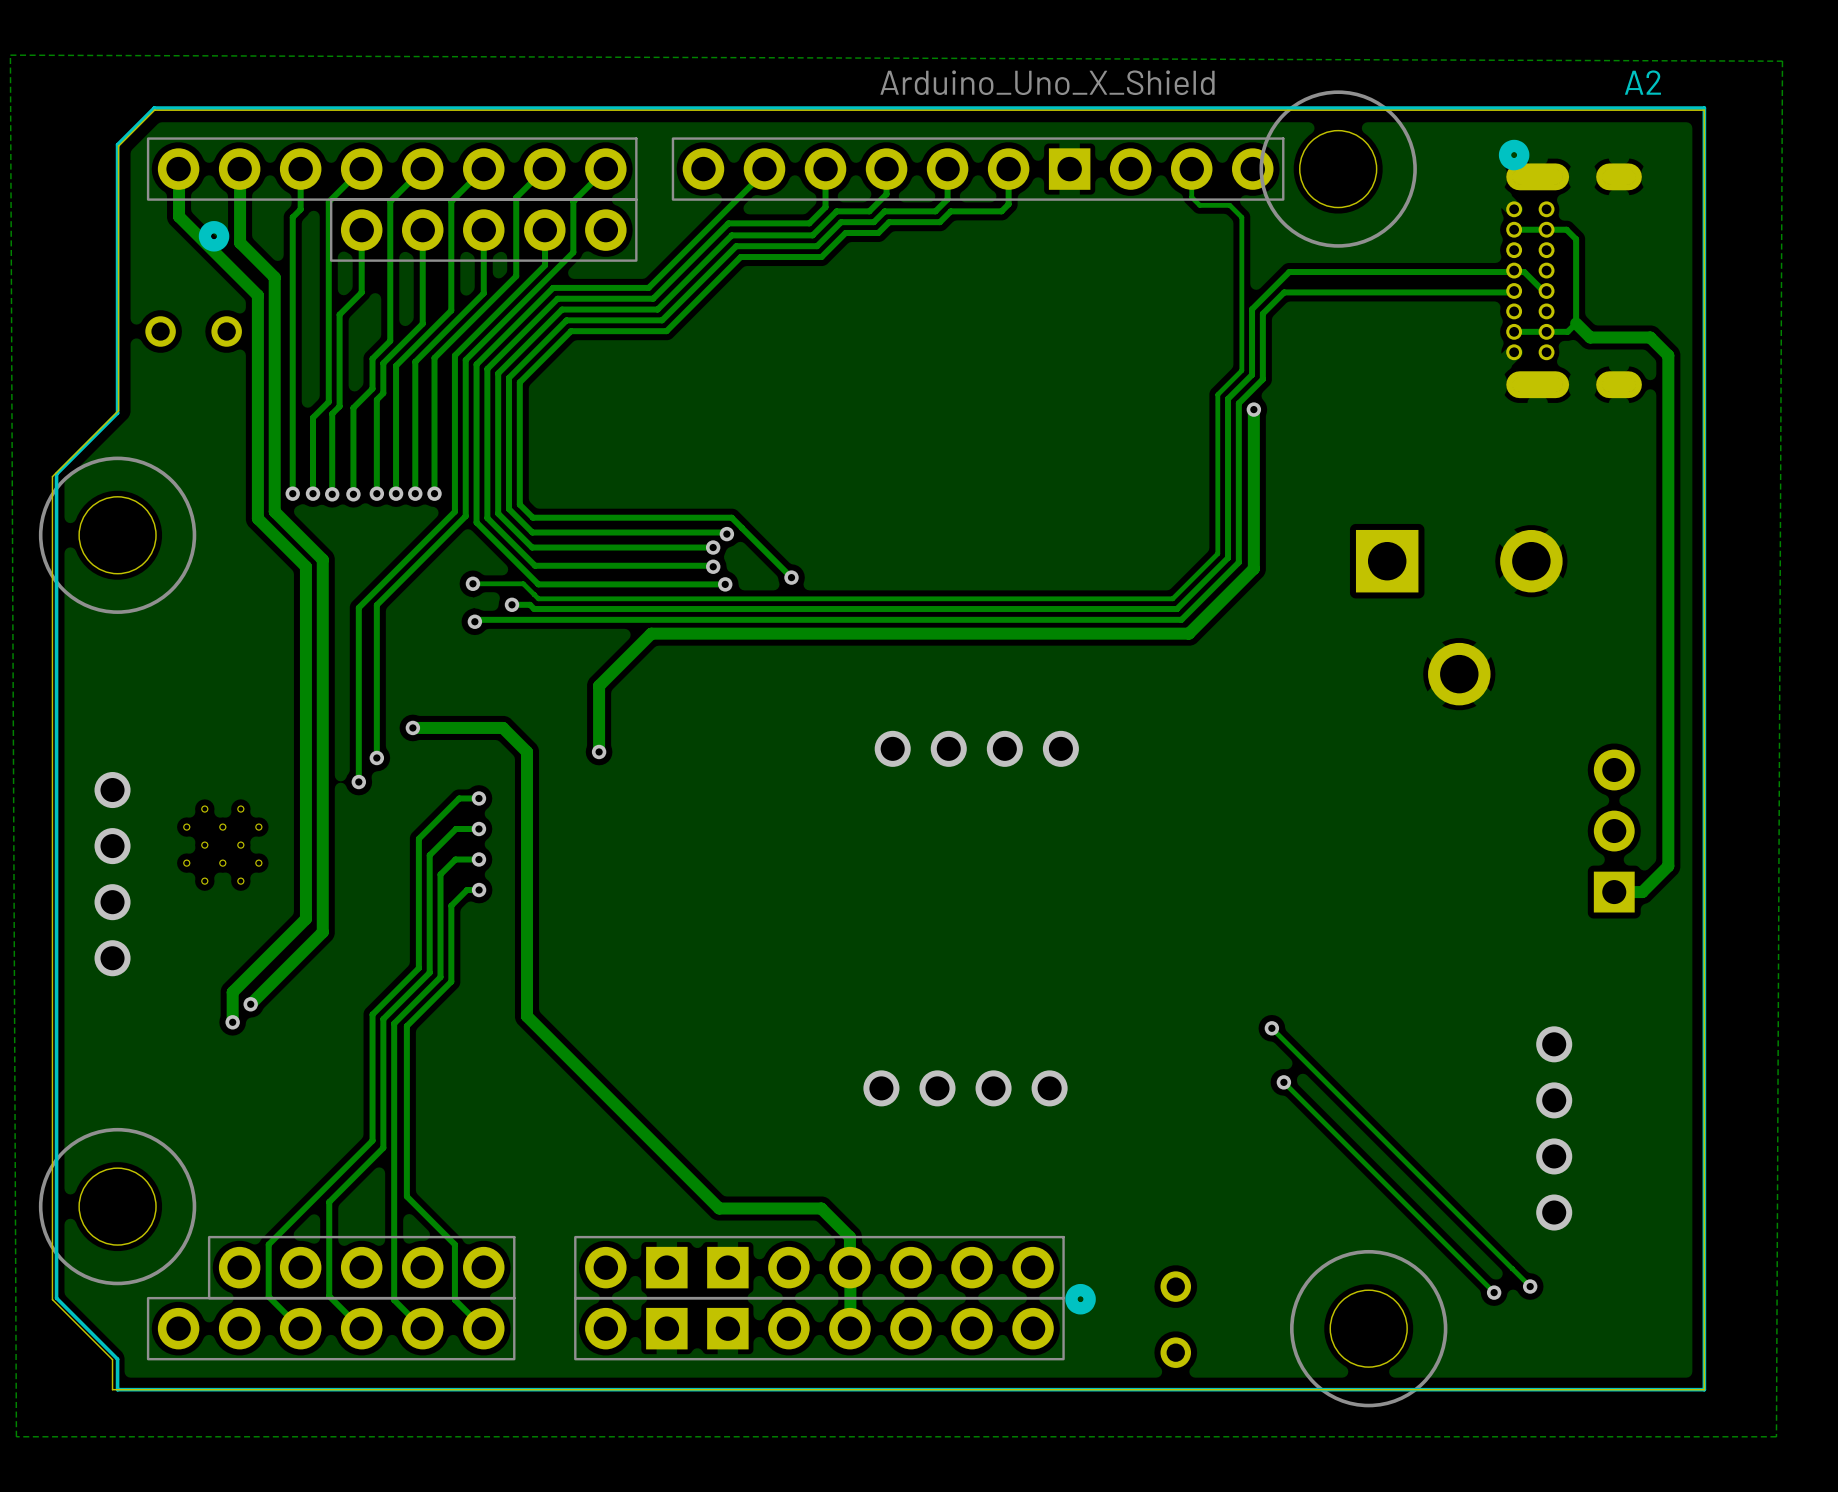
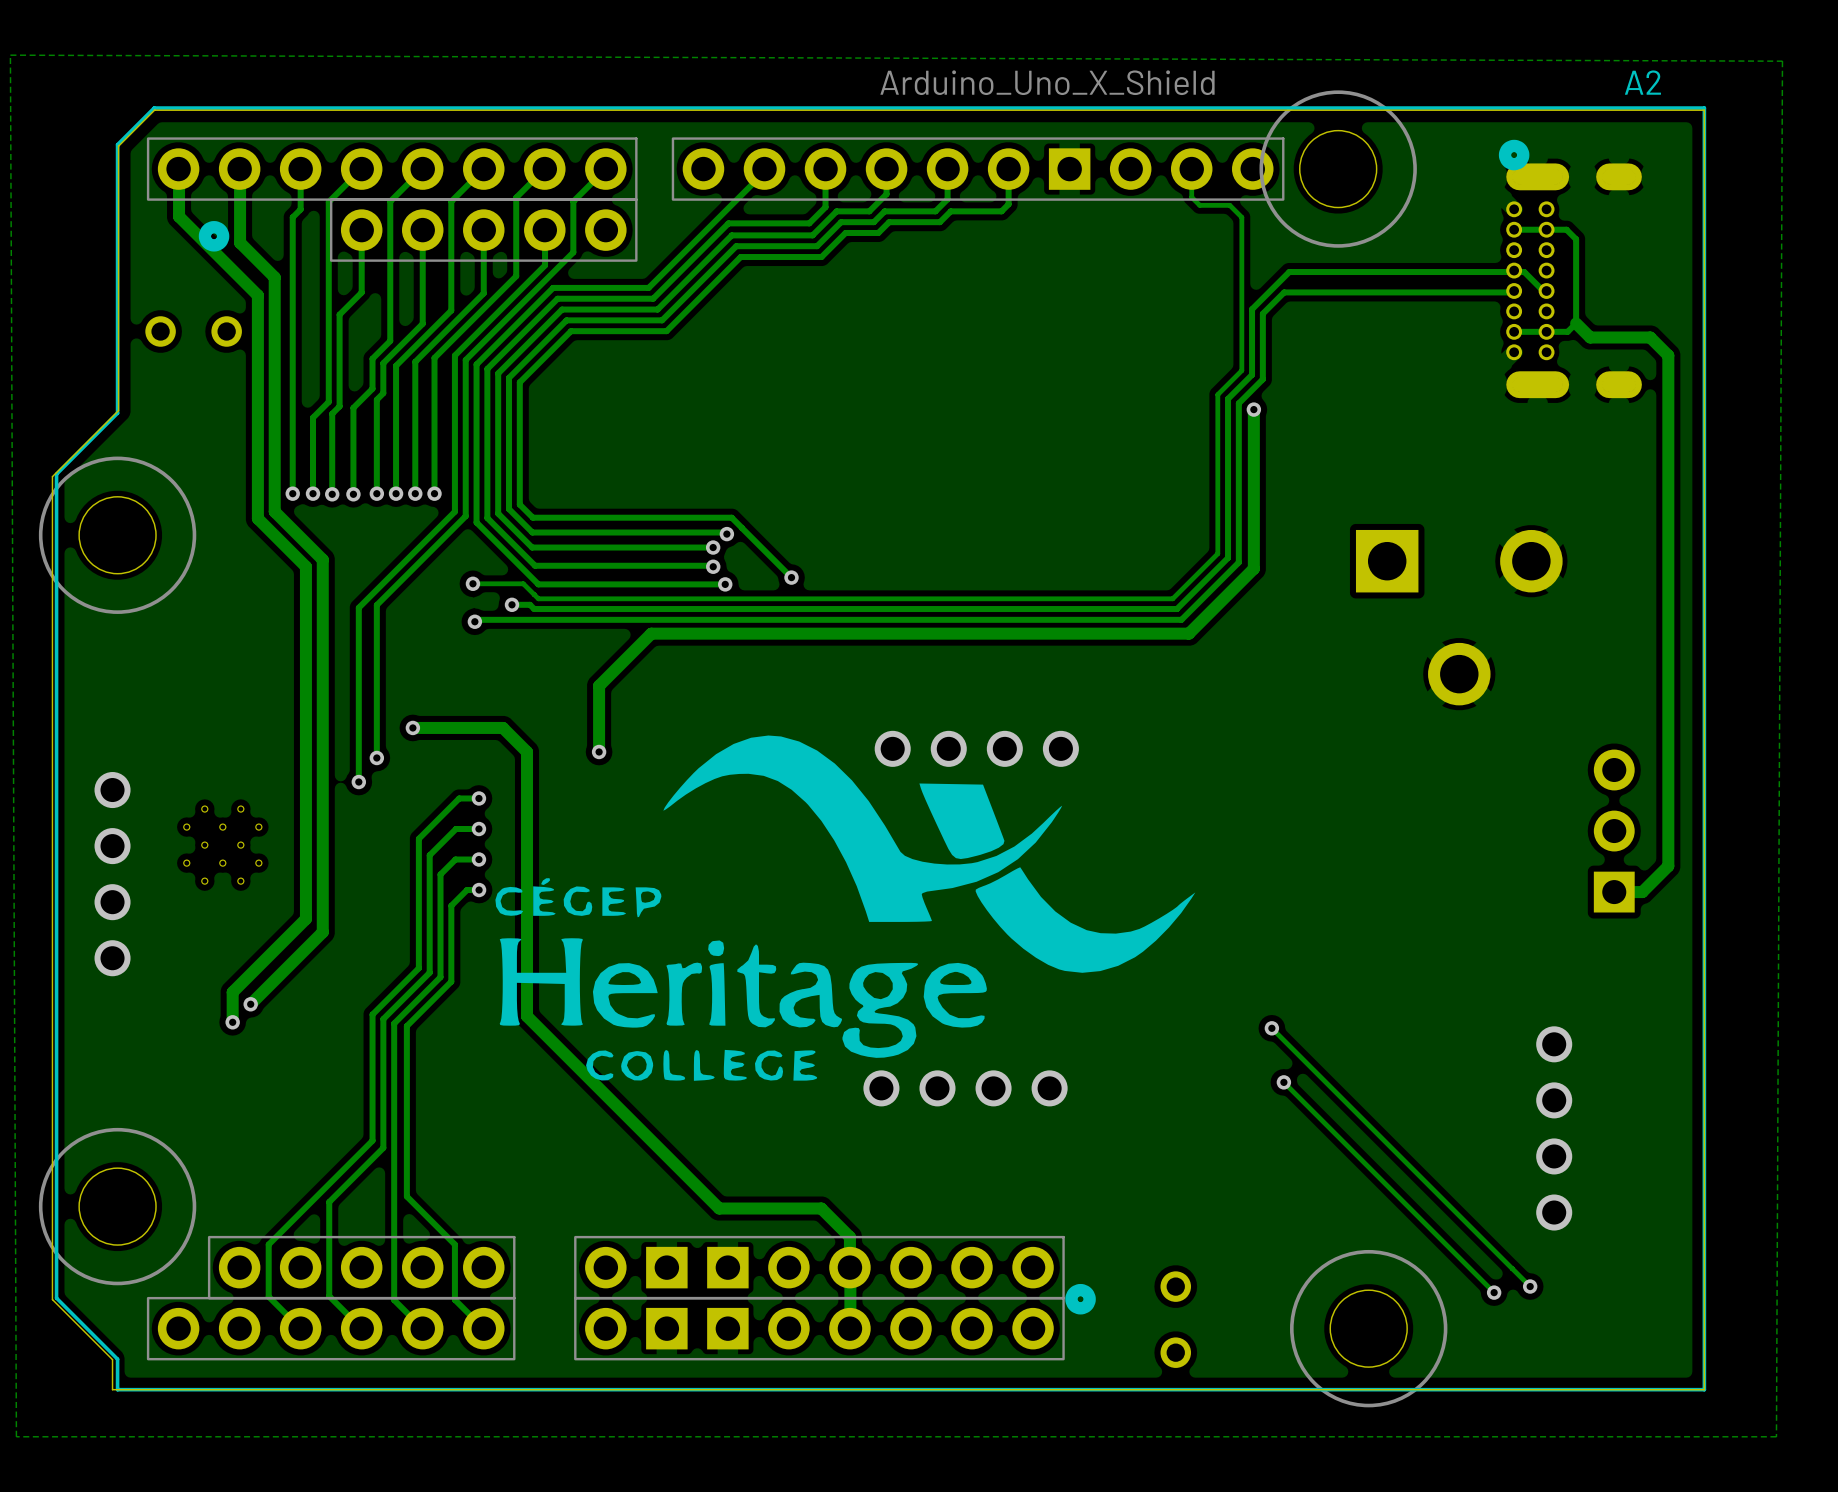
drawing: none -> [495, 735, 1196, 1081]

